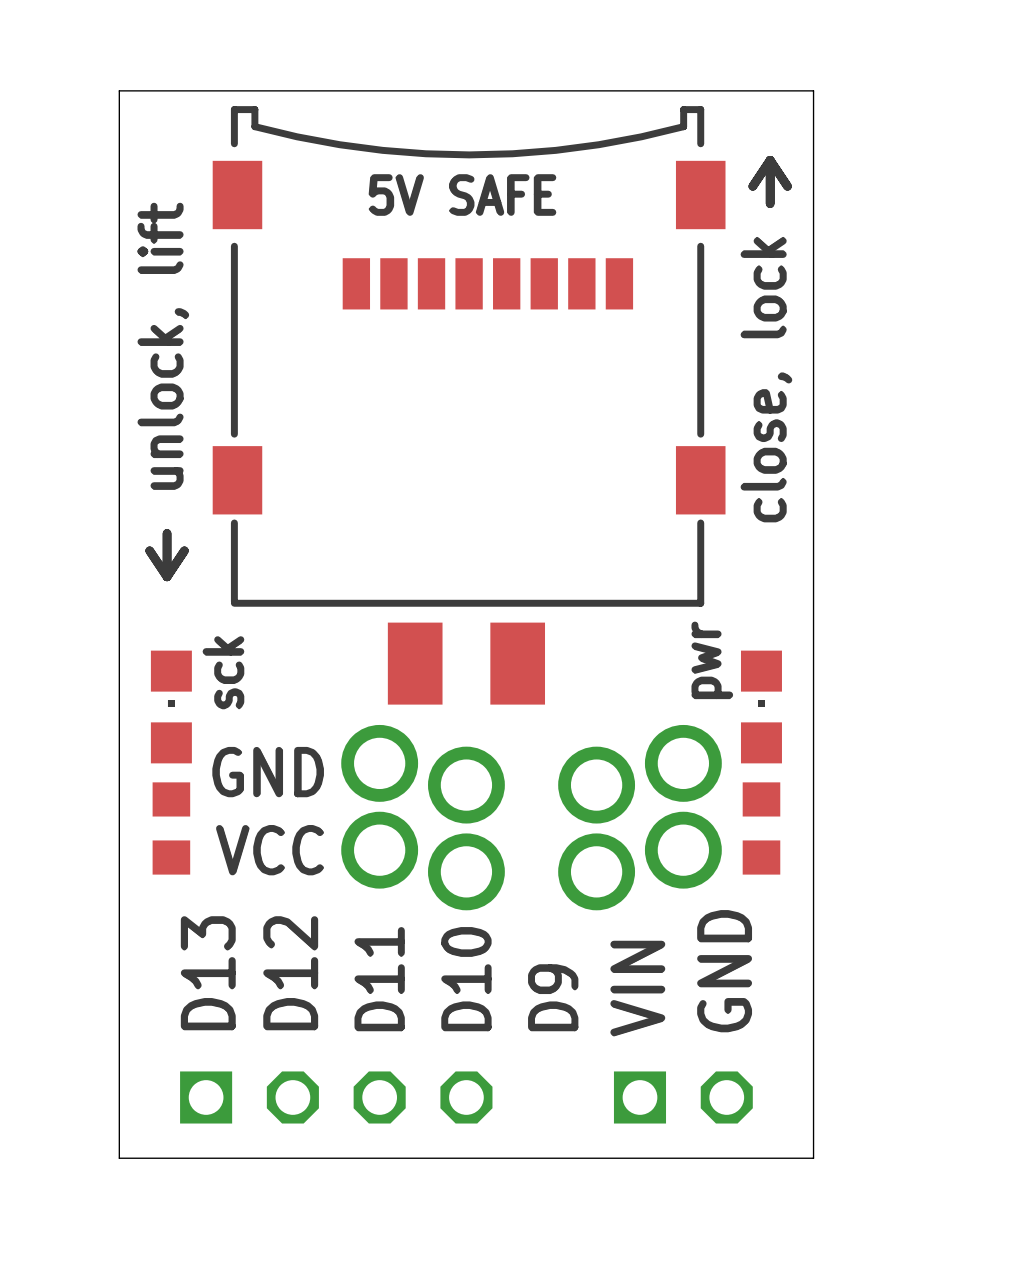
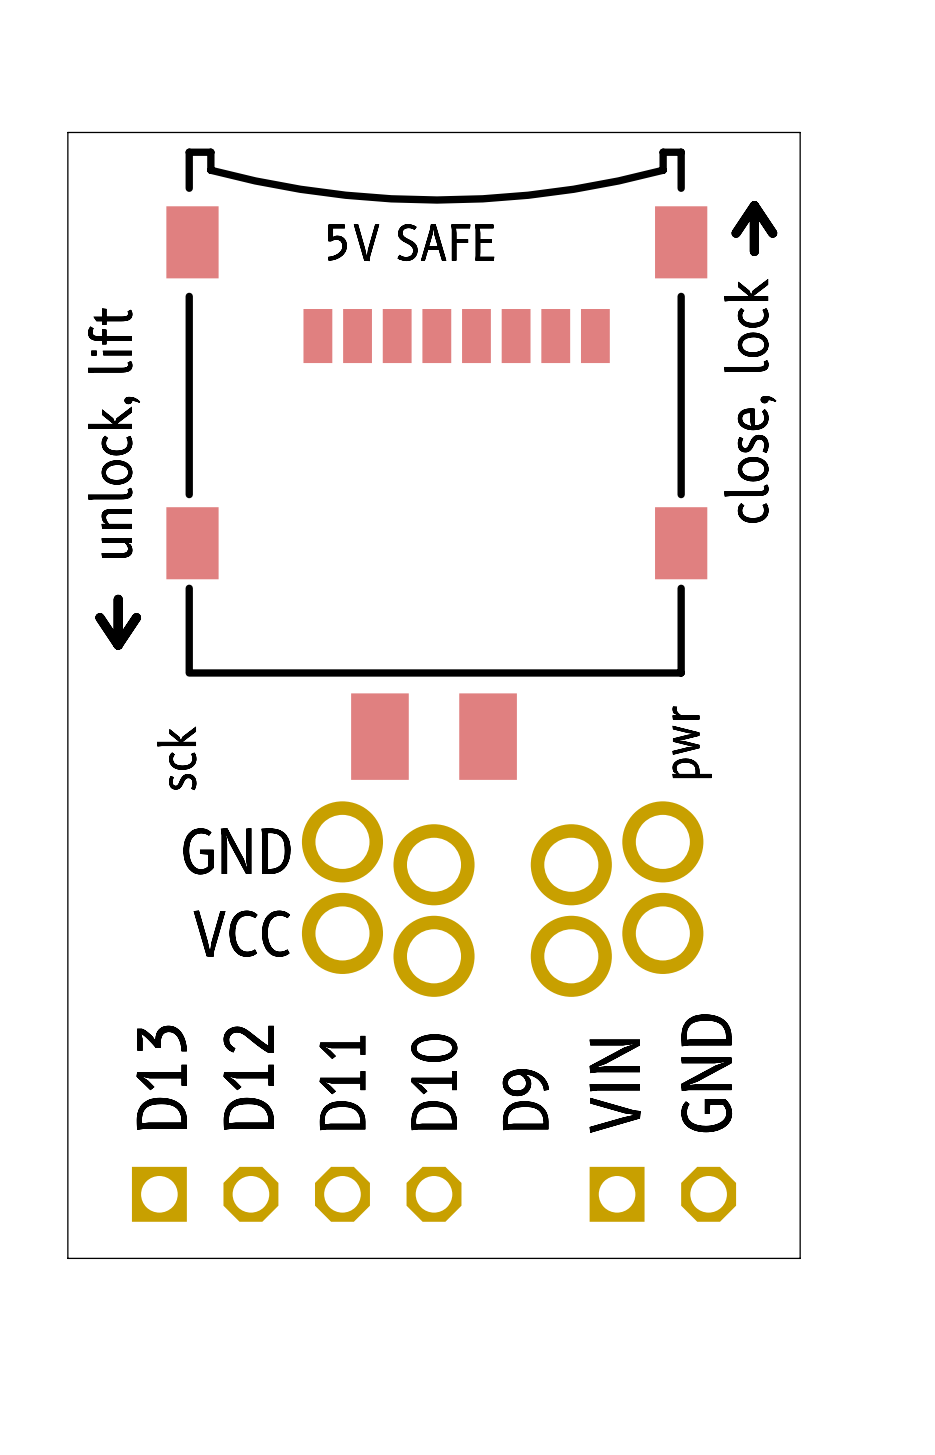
drawing: [167, 700, 175, 707] -> none
drawing: [758, 700, 765, 707] -> none
part: (171, 706) -> none
part: (761, 706) -> none
part: (171, 828) -> none
part: (761, 828) -> none

